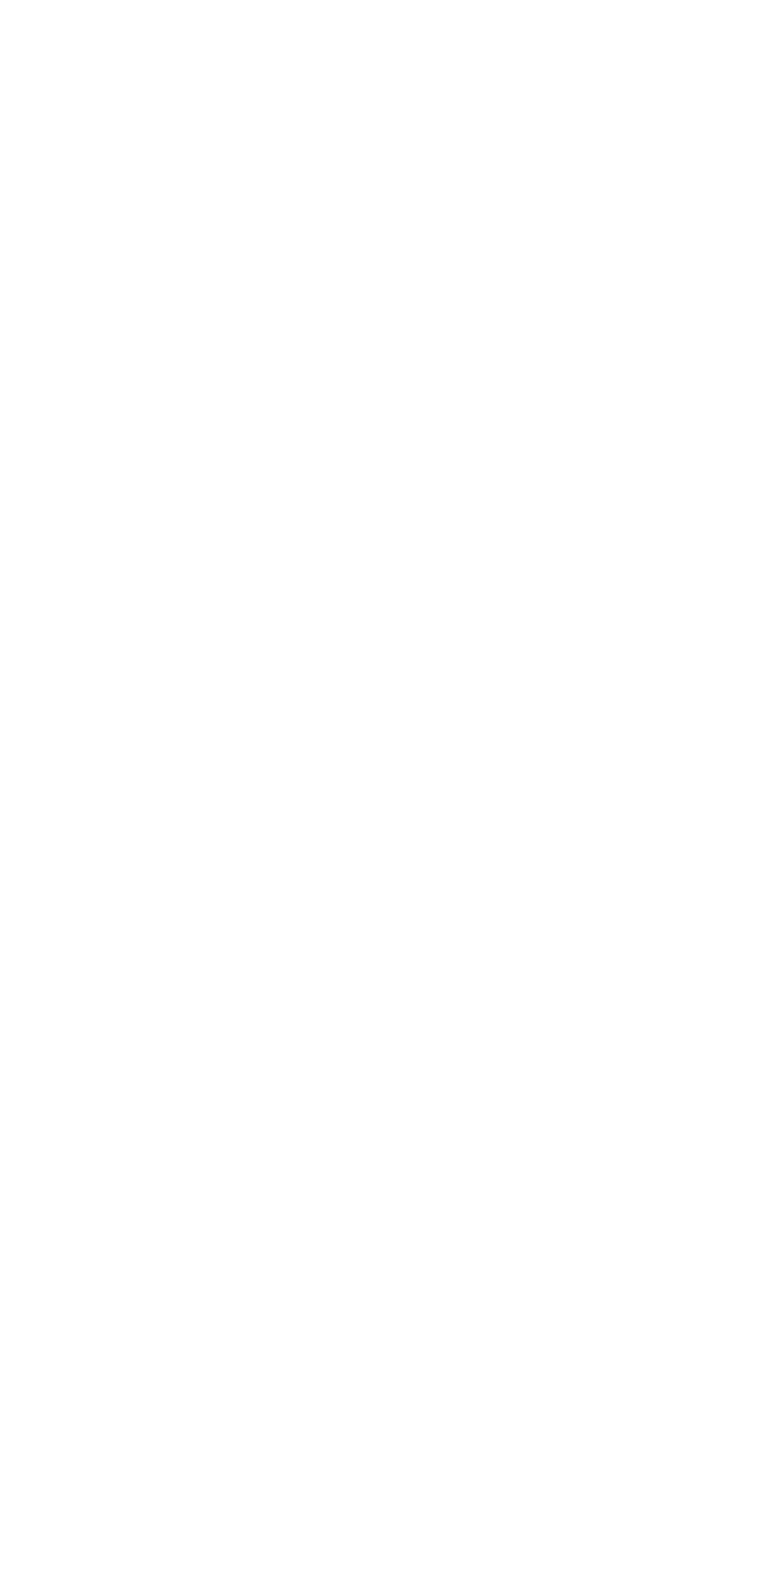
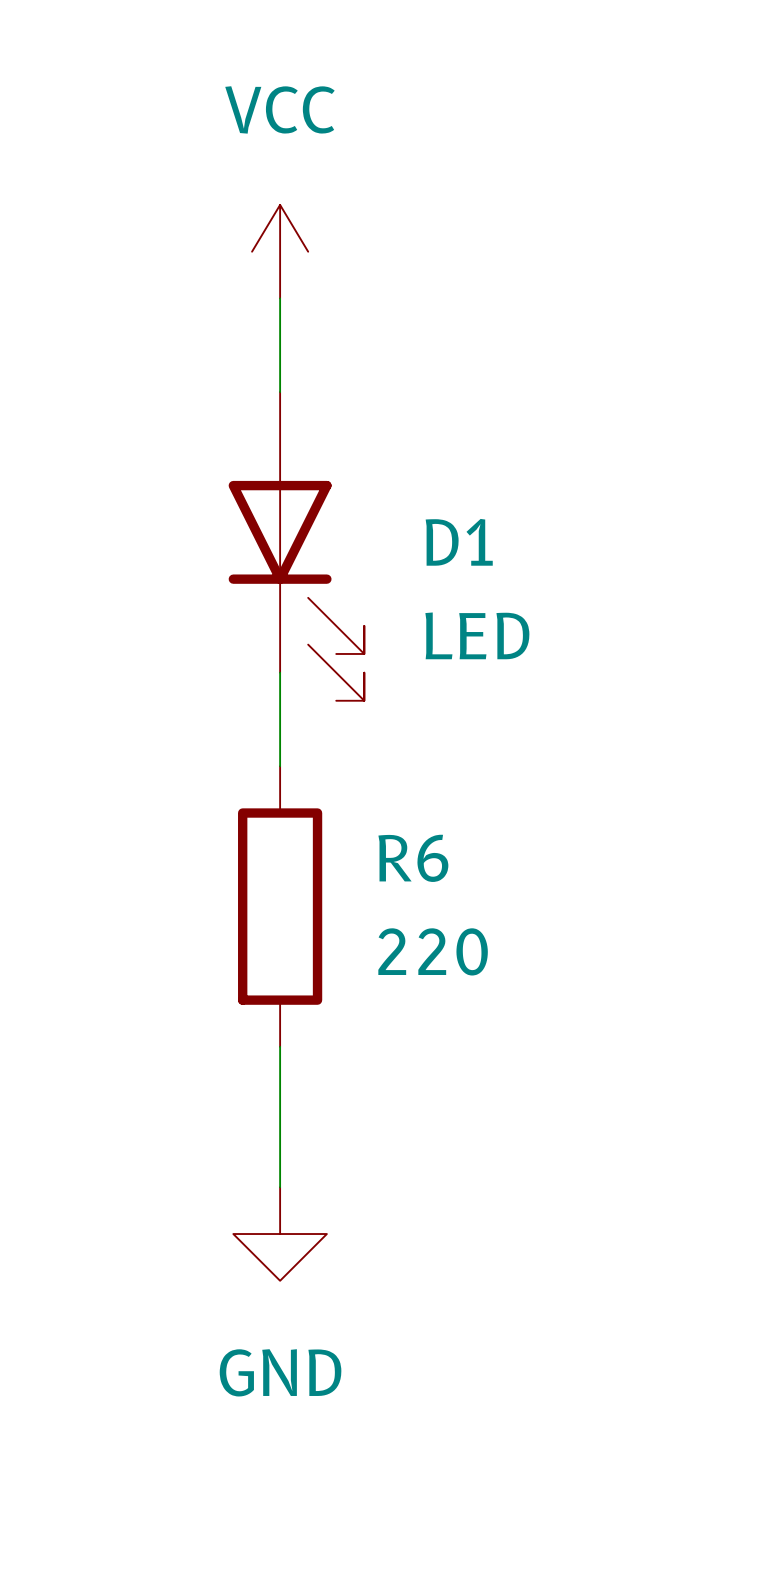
power symbol: none -> VCC (280, 251)
wire: none -> (280, 298) (280, 392)
D1: none -> LED (296, 546)
wire: none -> (280, 672) (280, 766)
R6: none -> 220 (280, 906)
wire: none -> (280, 1046) (280, 1187)
power symbol: none -> GND (280, 1234)

